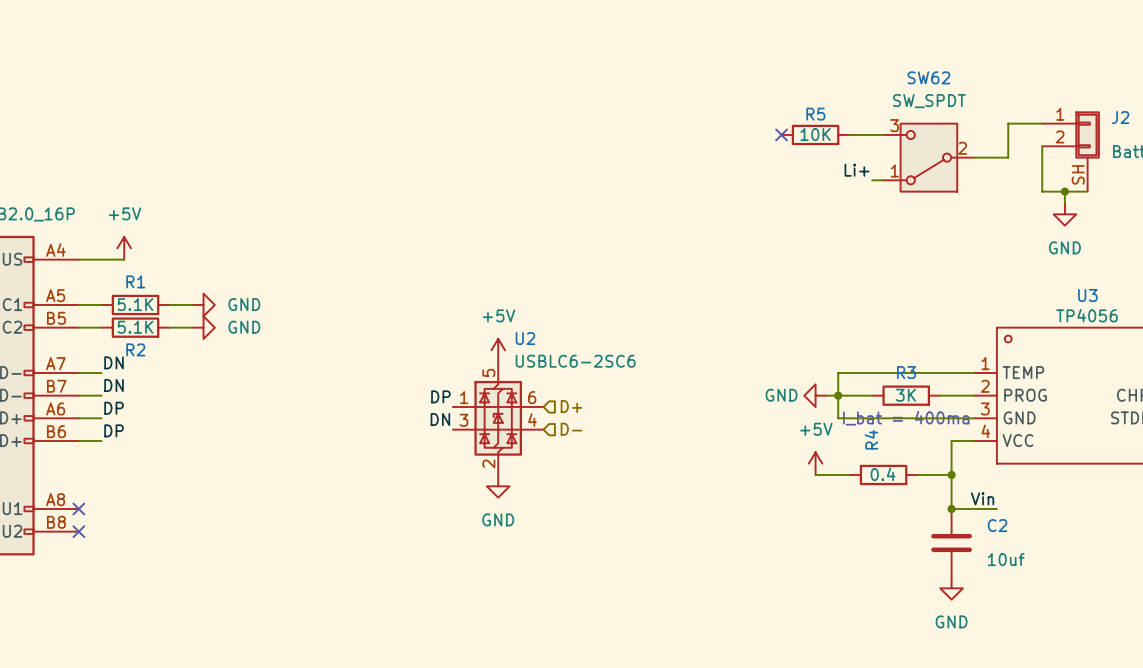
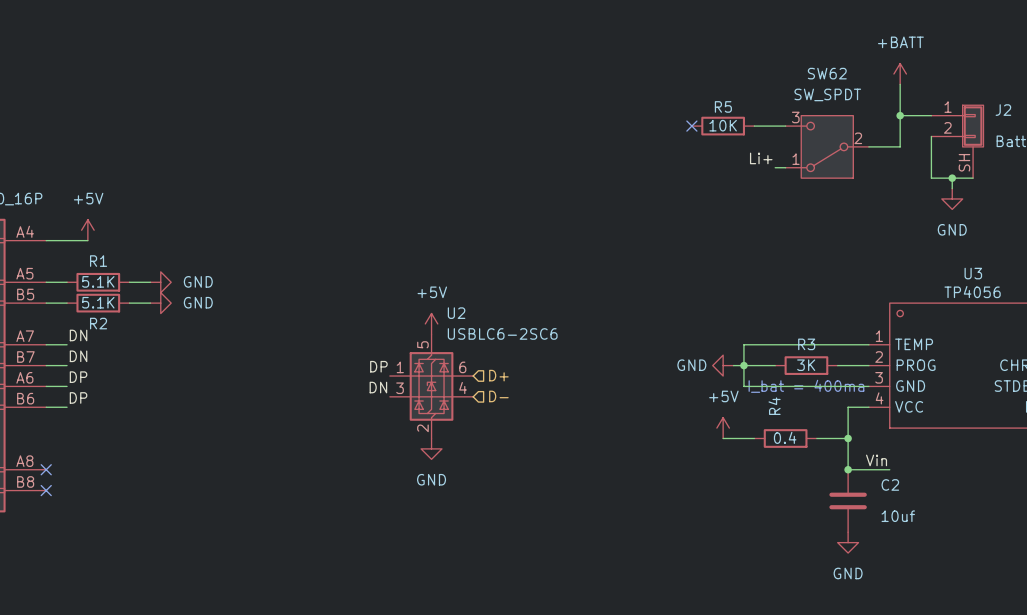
power symbol: none -> +BATT (900, 74)
wire: none -> (900, 84) (900, 115)
junction: none -> (900, 115)

